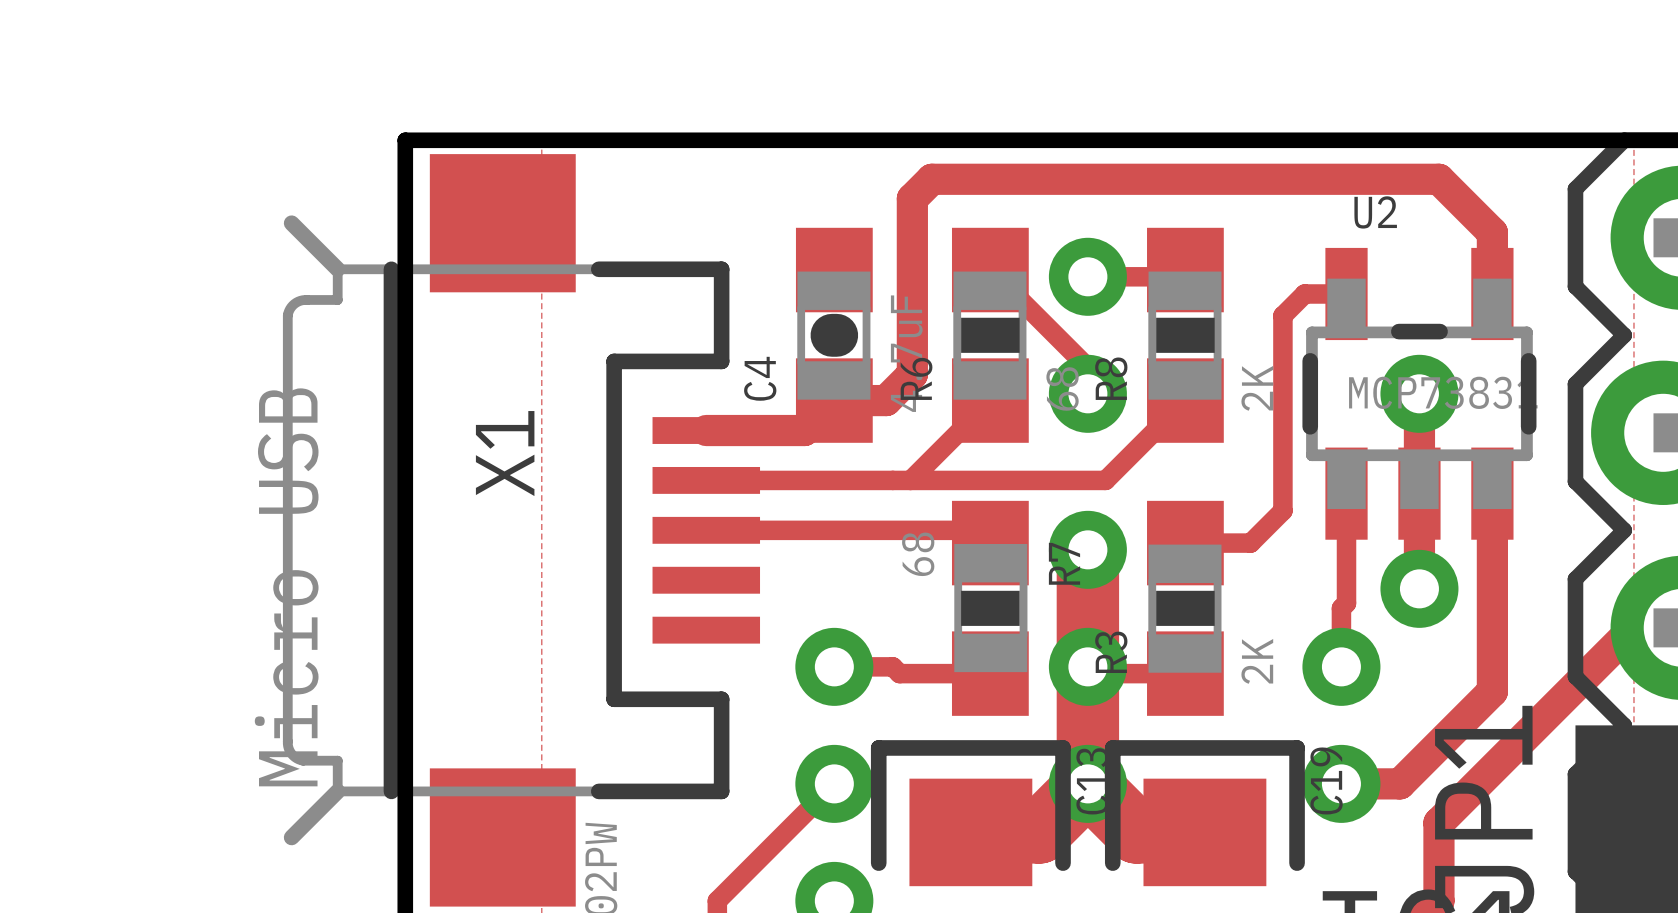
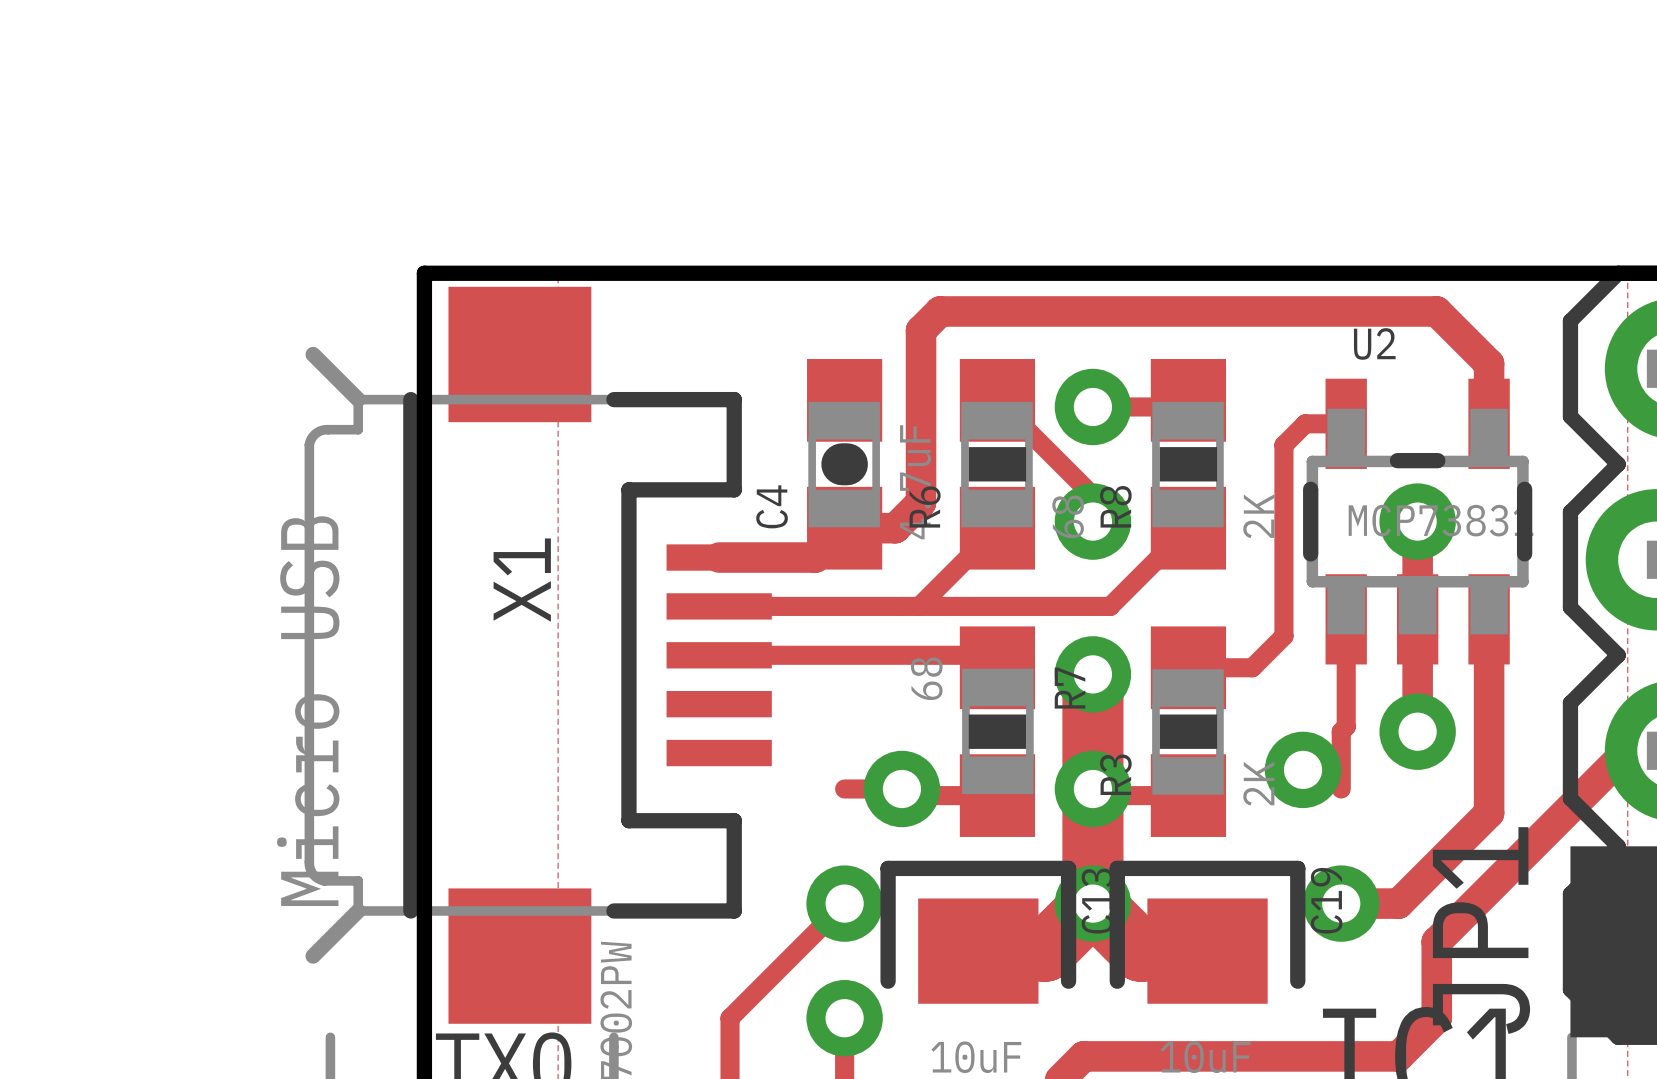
via position: (1419, 588) -> (1417, 731)
via position: (834, 666) -> (901, 789)
via position: (1341, 666) -> (1303, 769)

